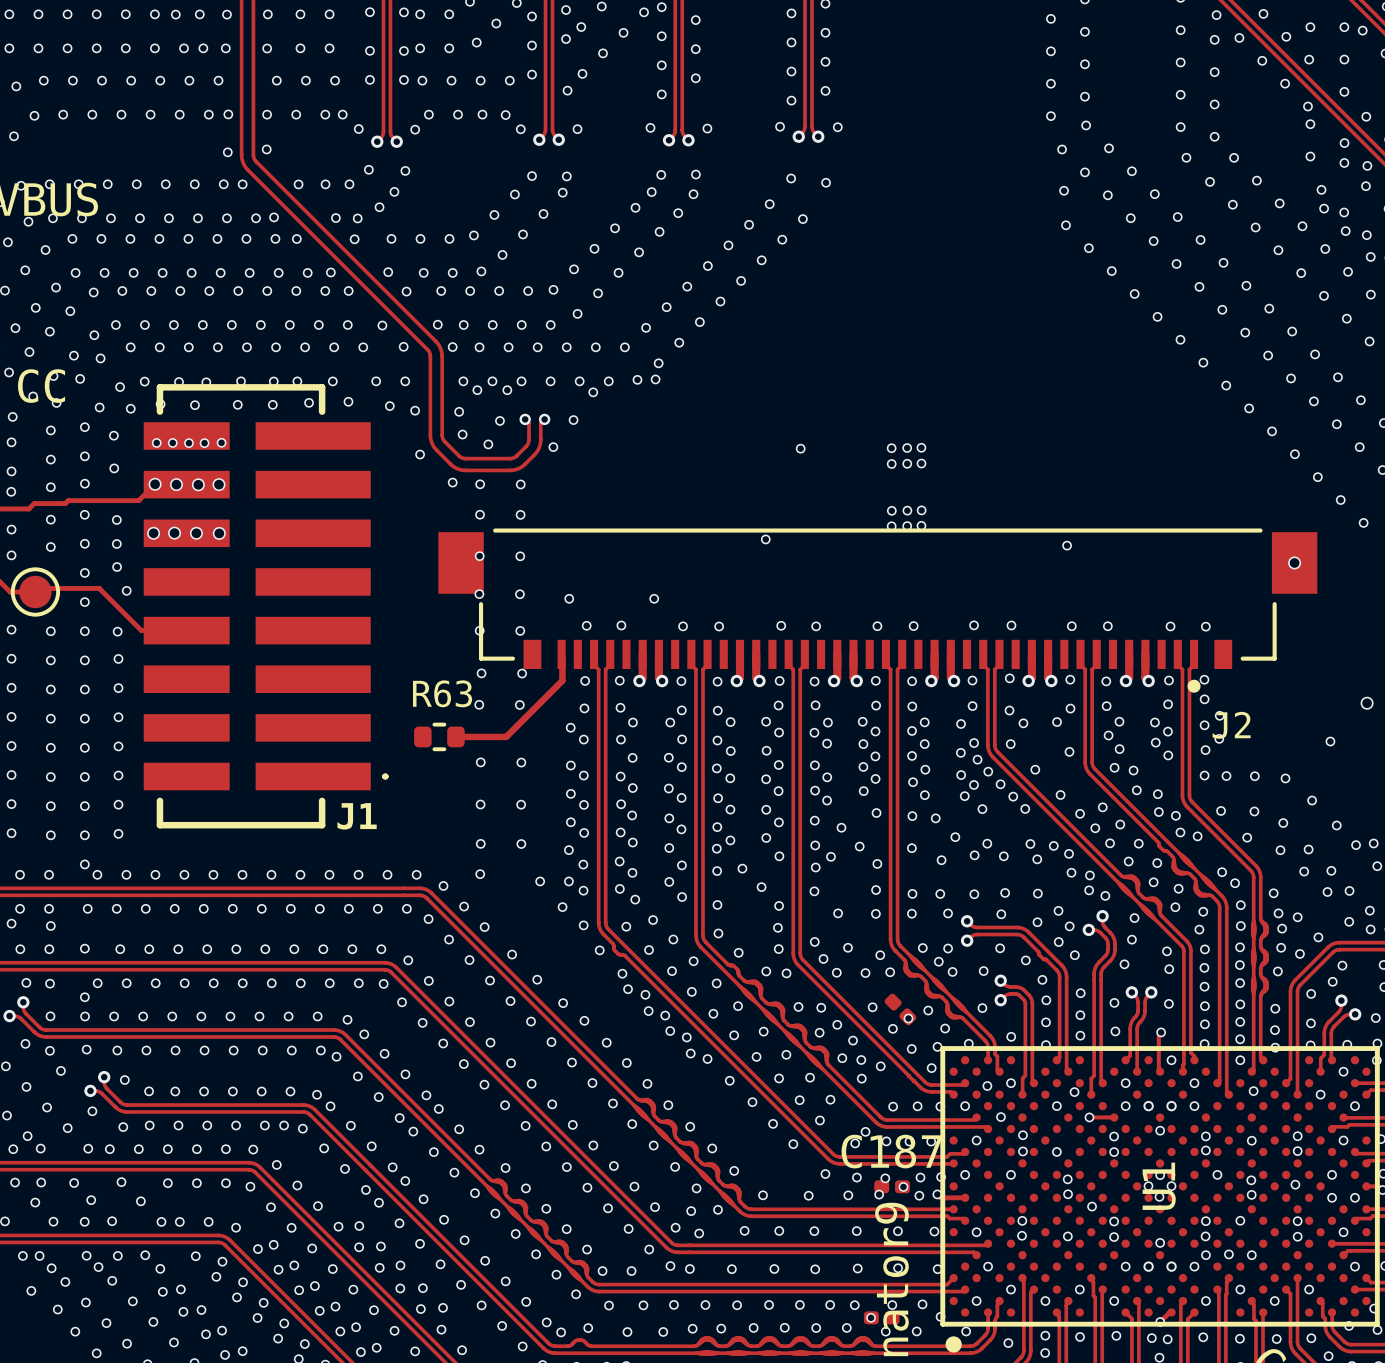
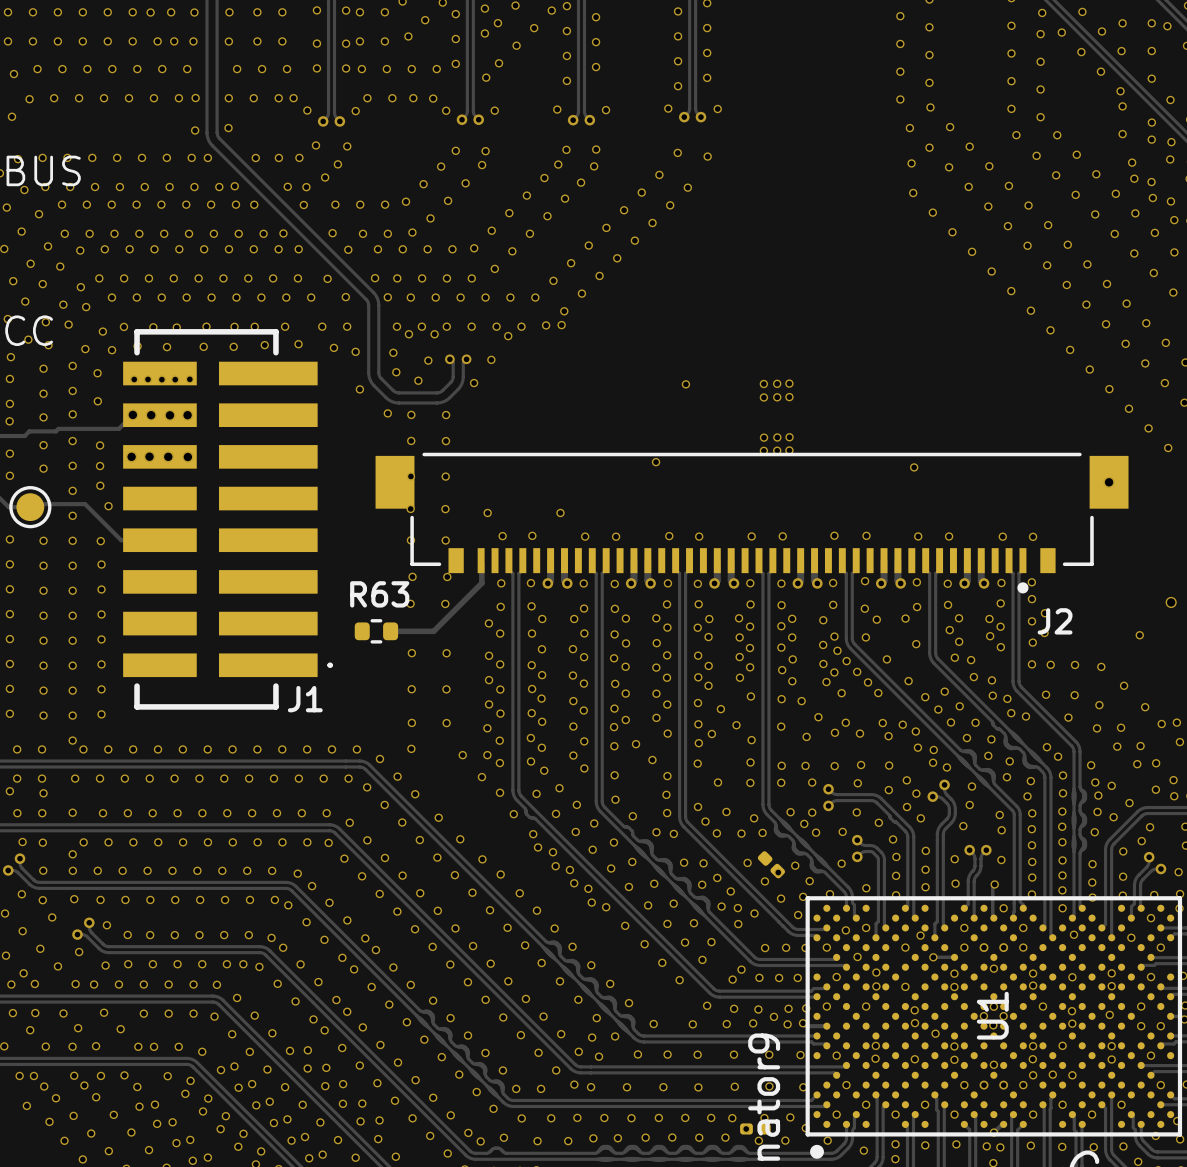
C187: (892, 1186) -> none

